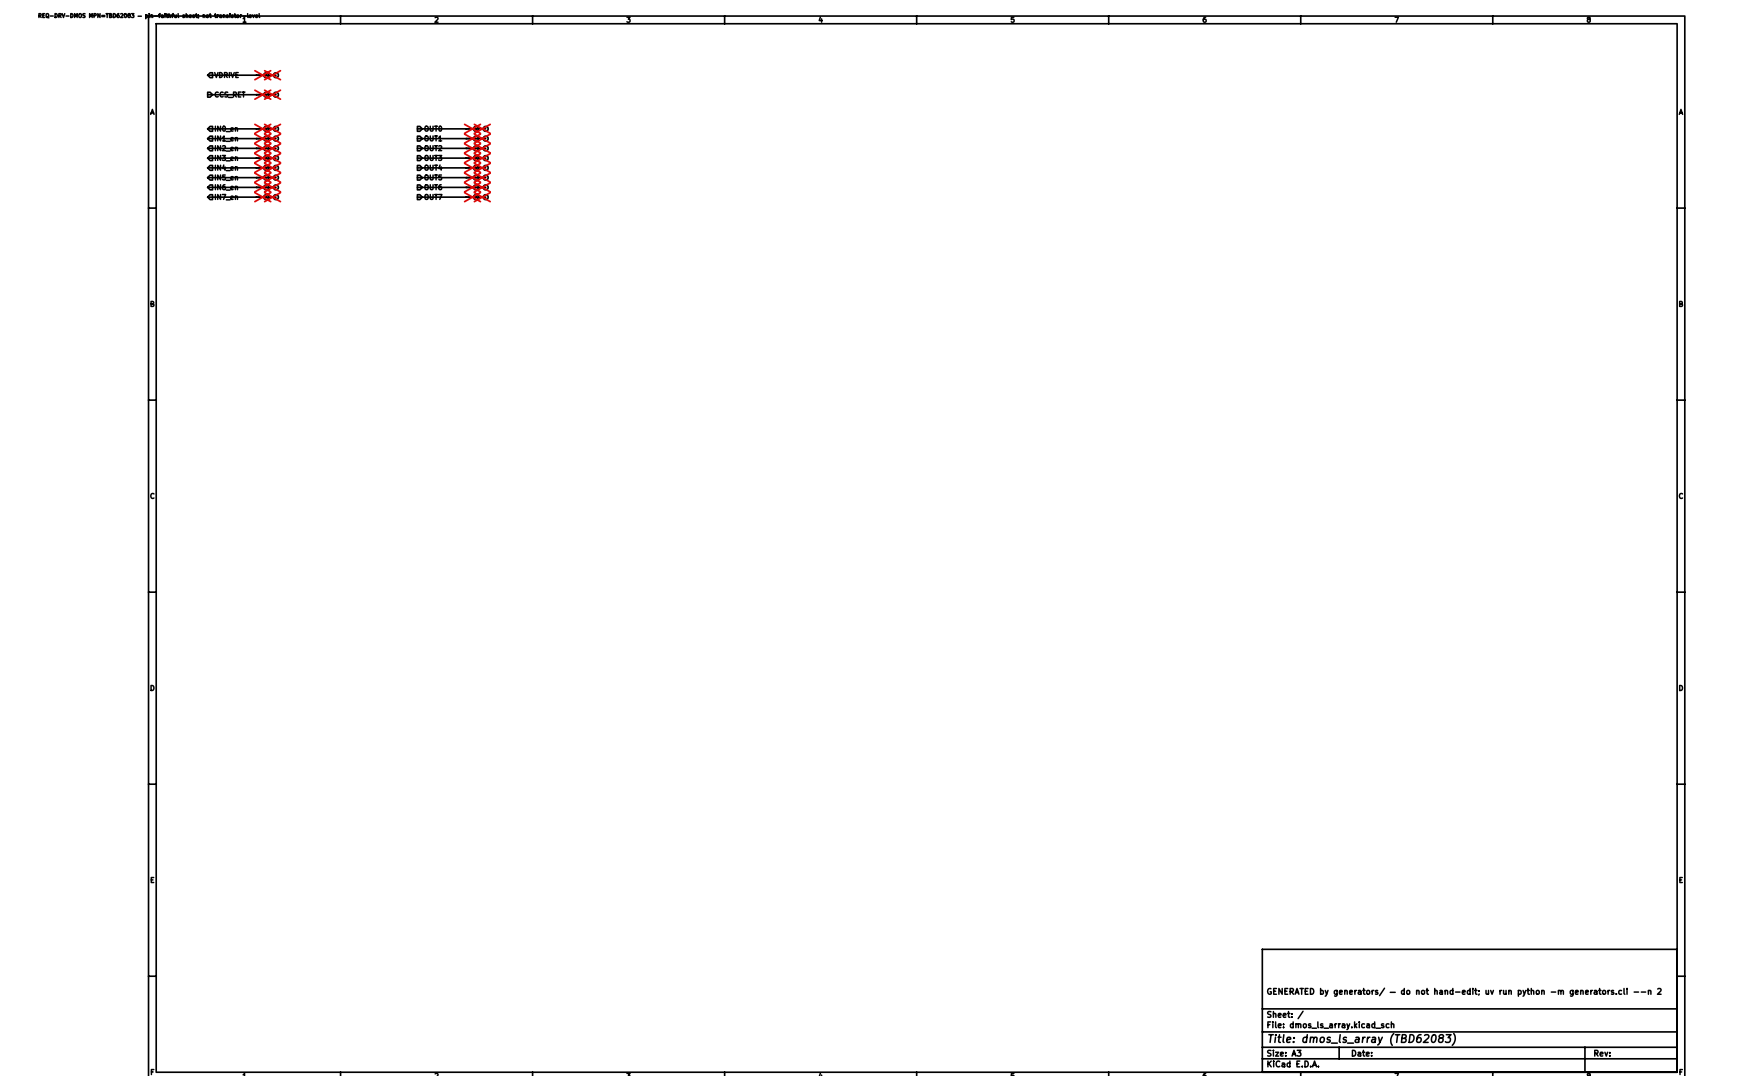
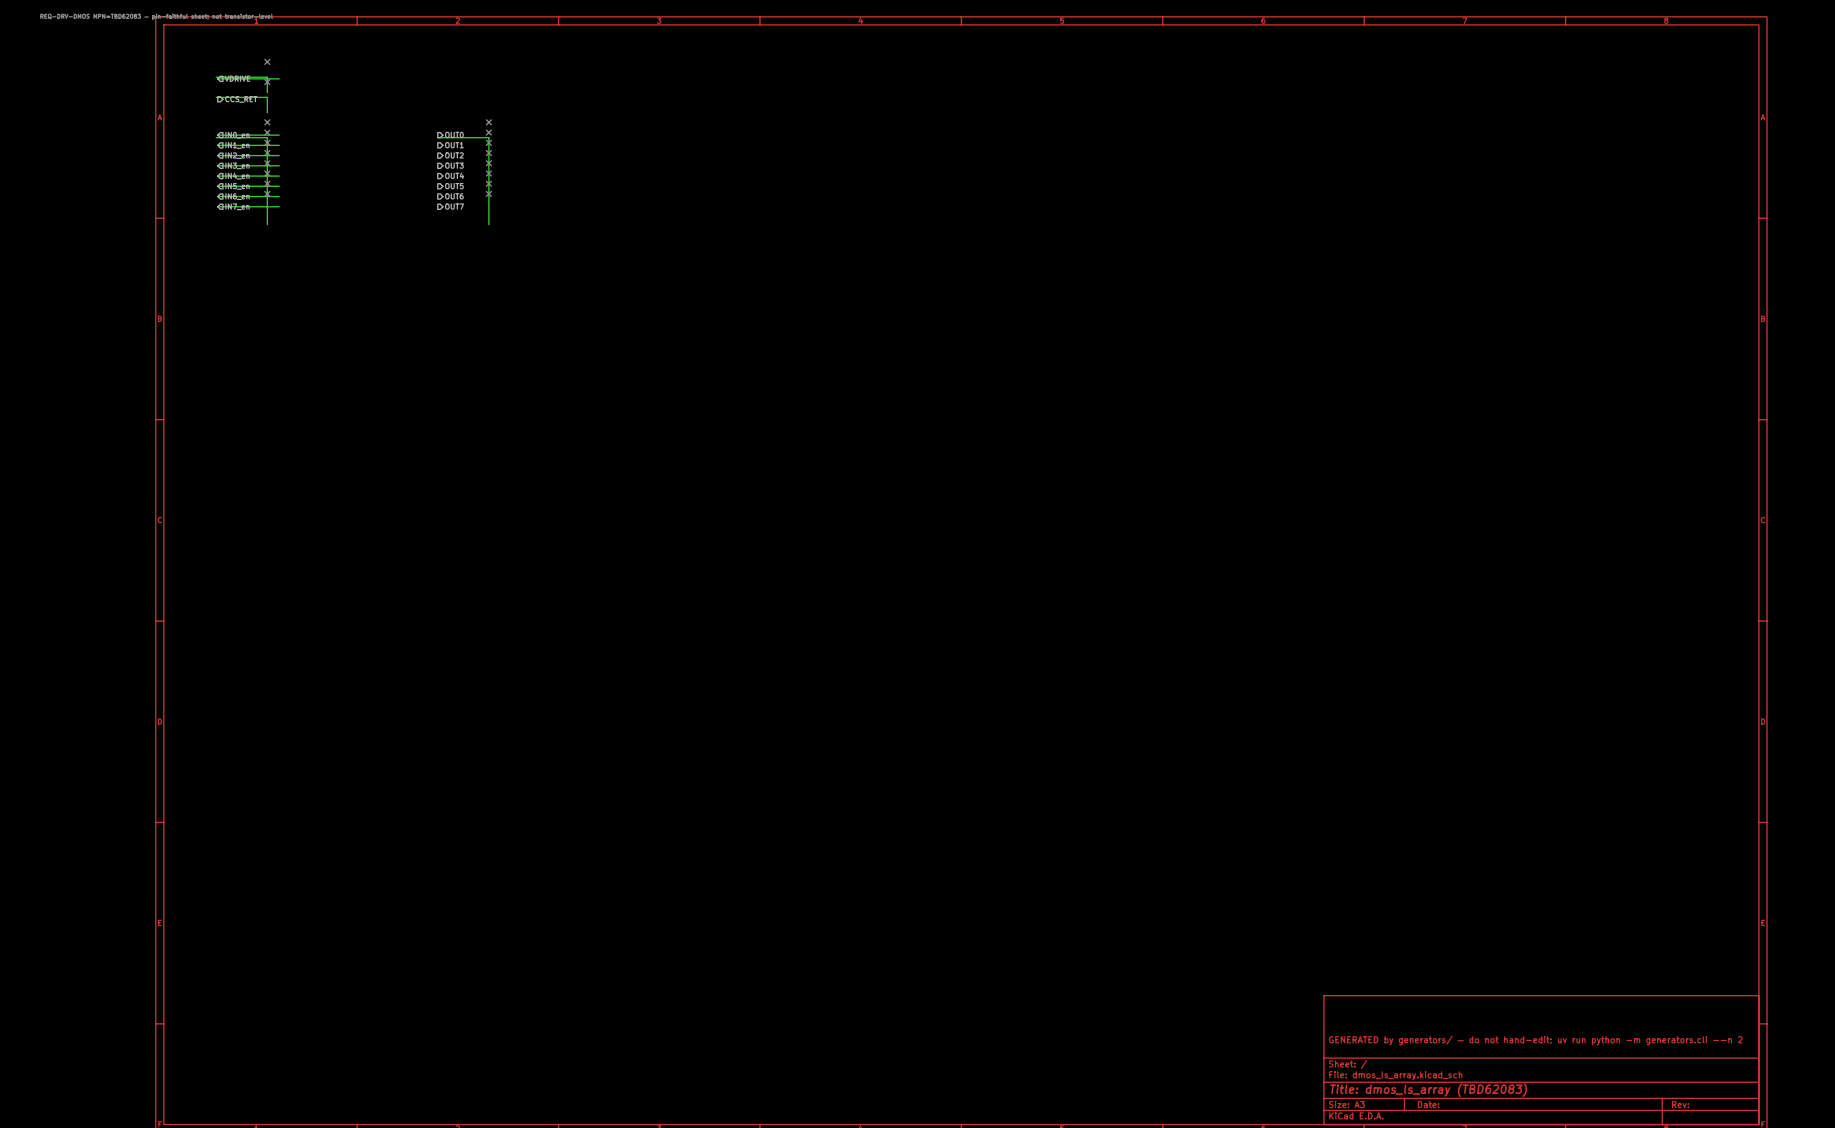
no-connect mark: none -> (267, 61)
wire: none -> (216, 77) (267, 77) (267, 92)
part: (262, 75) -> none
part: (272, 75) -> none
no-connect mark: none -> (267, 82)
wire: none -> (216, 97) (267, 97) (267, 112)
wire: (207, 94) (266, 94) -> none
part: (262, 94) -> none
part: (272, 94) -> none
no-connect mark: none -> (267, 122)
no-connect mark: none -> (488, 122)
no-connect mark: none -> (267, 132)
no-connect mark: none -> (488, 132)
part: (262, 128) -> none
part: (272, 128) -> none
wire: (417, 128) (475, 128) -> none
part: (472, 128) -> none
part: (482, 128) -> none
wire: none -> (216, 137) (267, 137) (267, 224)
wire: none -> (437, 137) (488, 137) (488, 224)
no-connect mark: none -> (267, 142)
no-connect mark: none -> (488, 142)
part: (262, 138) -> none
part: (272, 138) -> none
wire: (417, 138) (475, 138) -> none
part: (472, 138) -> none
part: (482, 138) -> none
no-connect mark: none -> (267, 153)
no-connect mark: none -> (488, 153)
part: (262, 148) -> none
part: (272, 148) -> none
wire: (417, 148) (475, 148) -> none
part: (472, 148) -> none
part: (482, 148) -> none
no-connect mark: none -> (267, 163)
no-connect mark: none -> (488, 163)
part: (262, 158) -> none
part: (272, 158) -> none
wire: (417, 158) (475, 158) -> none
part: (472, 158) -> none
part: (482, 158) -> none
no-connect mark: none -> (267, 173)
no-connect mark: none -> (488, 173)
part: (262, 167) -> none
part: (272, 167) -> none
wire: (417, 167) (475, 167) -> none
part: (472, 167) -> none
part: (482, 167) -> none
no-connect mark: none -> (267, 183)
no-connect mark: none -> (488, 183)
part: (262, 177) -> none
part: (272, 177) -> none
wire: (417, 177) (475, 177) -> none
part: (472, 177) -> none
part: (482, 177) -> none
no-connect mark: none -> (267, 193)
no-connect mark: none -> (488, 193)
part: (262, 187) -> none
part: (272, 187) -> none
wire: (417, 187) (475, 187) -> none
part: (472, 187) -> none
part: (482, 187) -> none
part: (262, 197) -> none
part: (272, 197) -> none
wire: (417, 197) (475, 197) -> none
part: (472, 197) -> none
part: (482, 197) -> none

